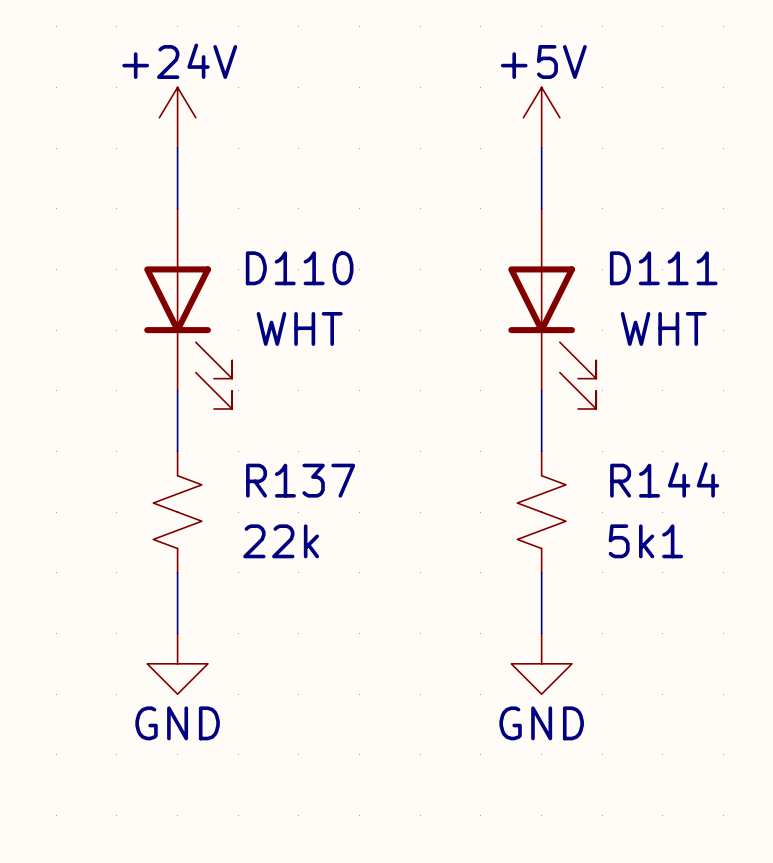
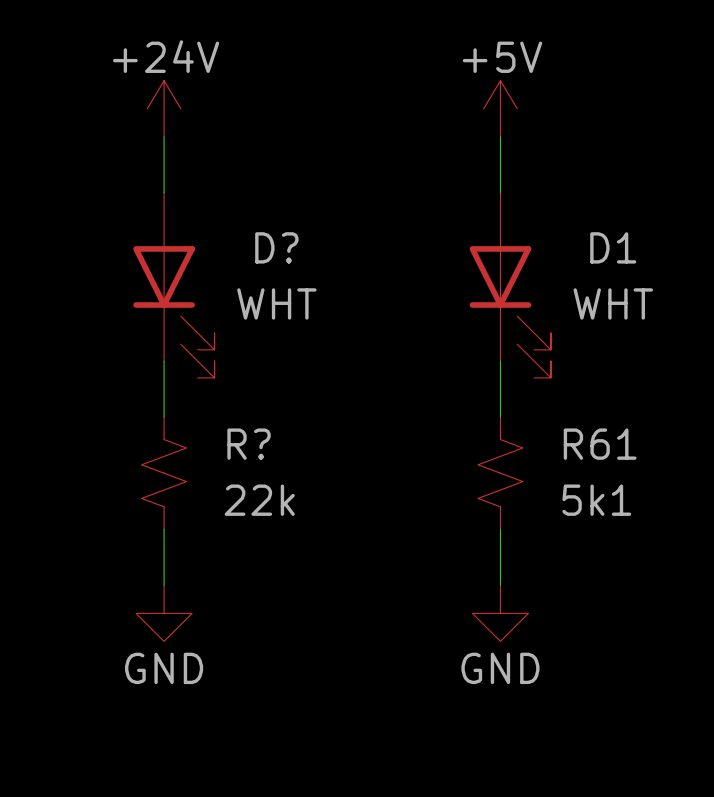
D110 name: D110 (299, 268) -> D? (276, 247)
D111 name: D111 (663, 268) -> D1 (613, 247)
R144 name: R144 (664, 479) -> R61 (600, 444)
R137 name: R137 (300, 480) -> R? (249, 444)

